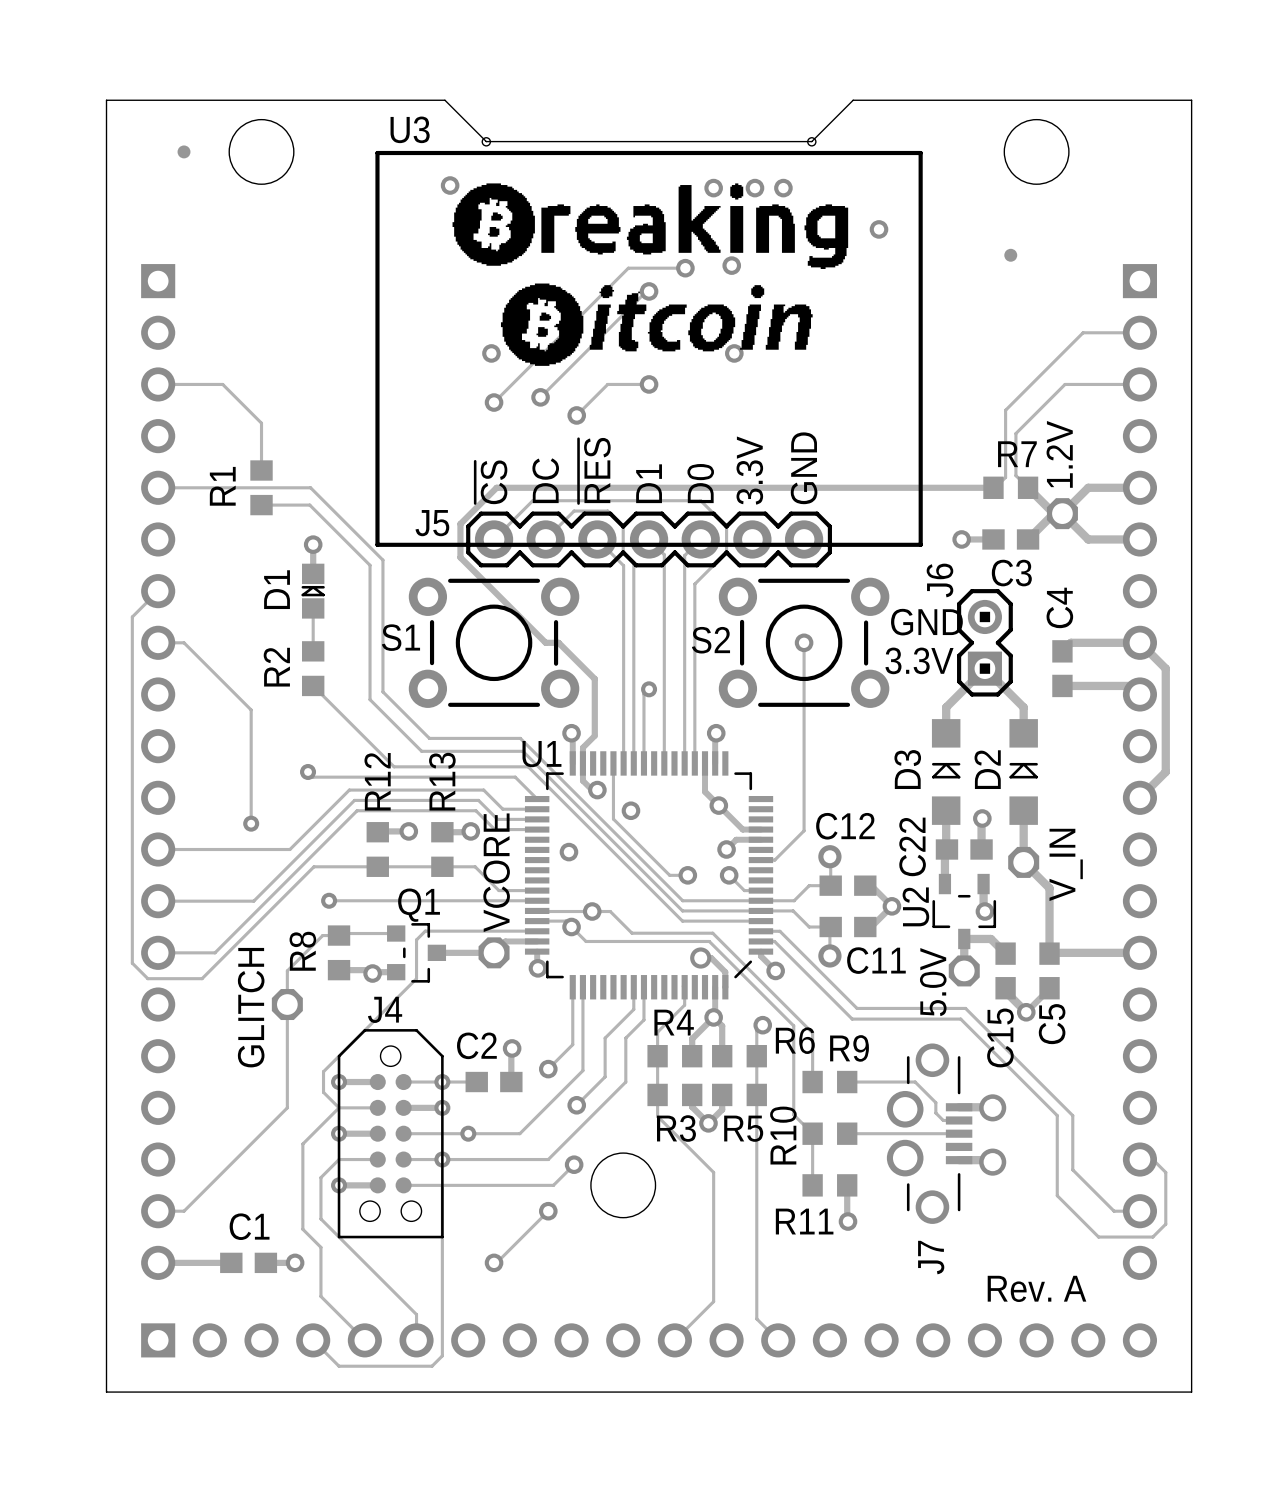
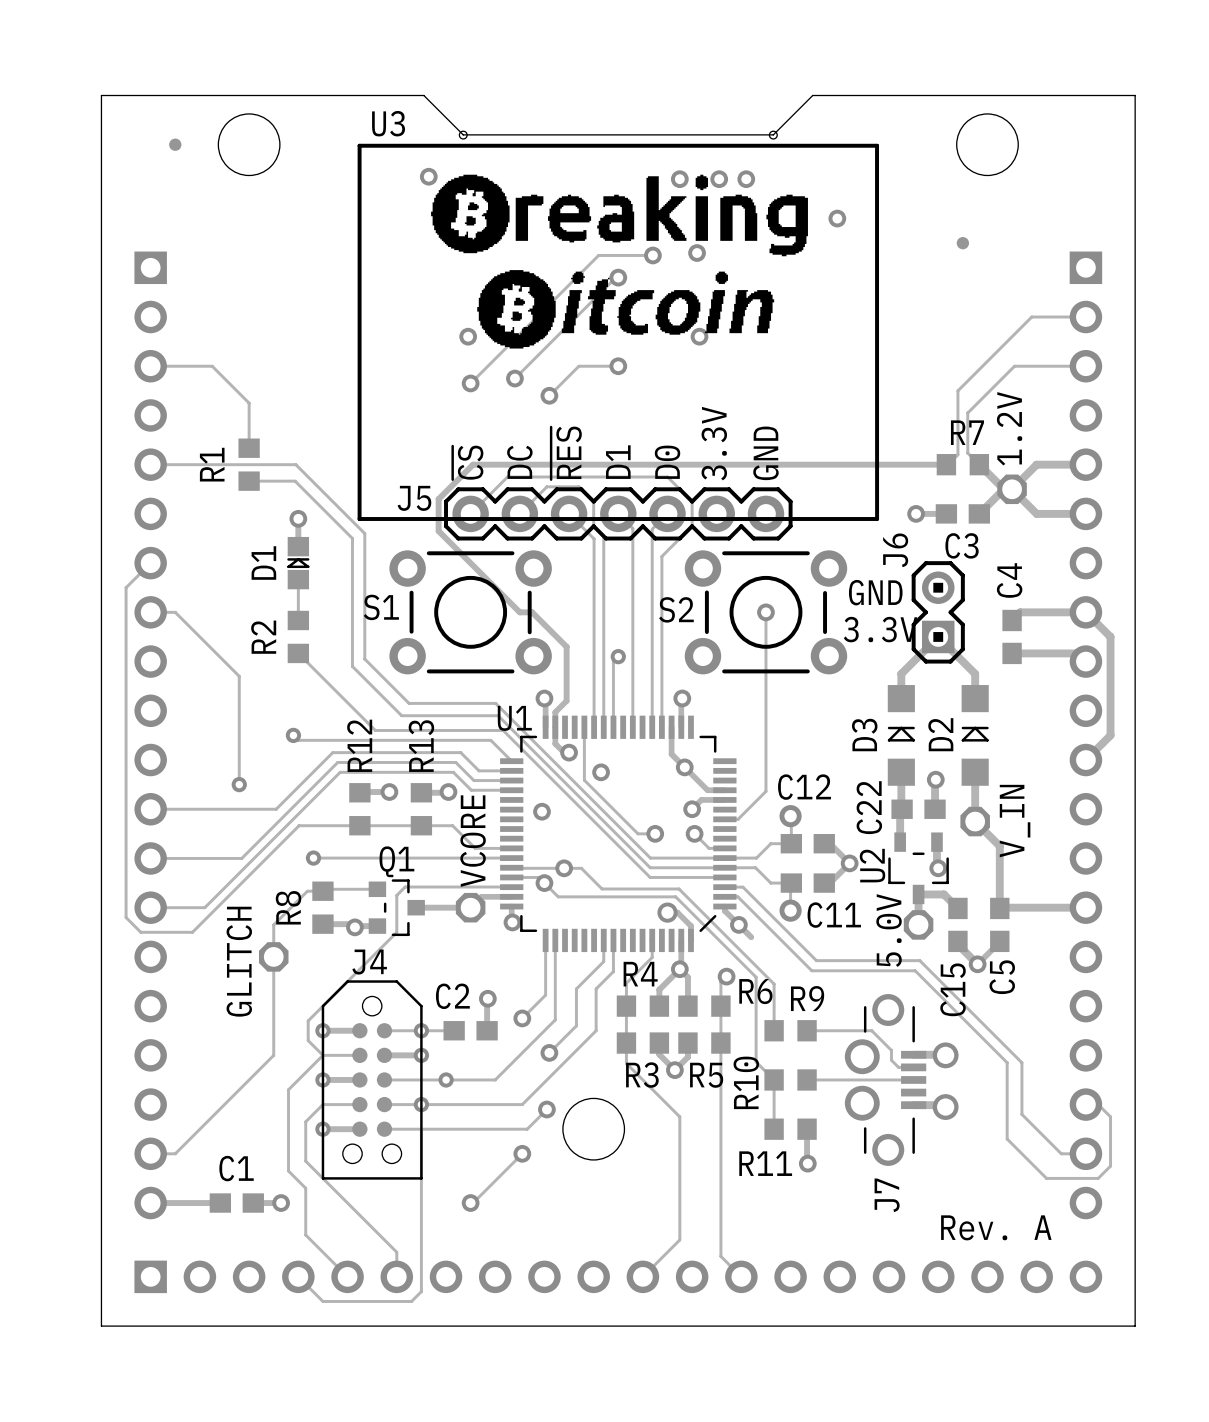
track: none -> (738, 924) (751, 937)

